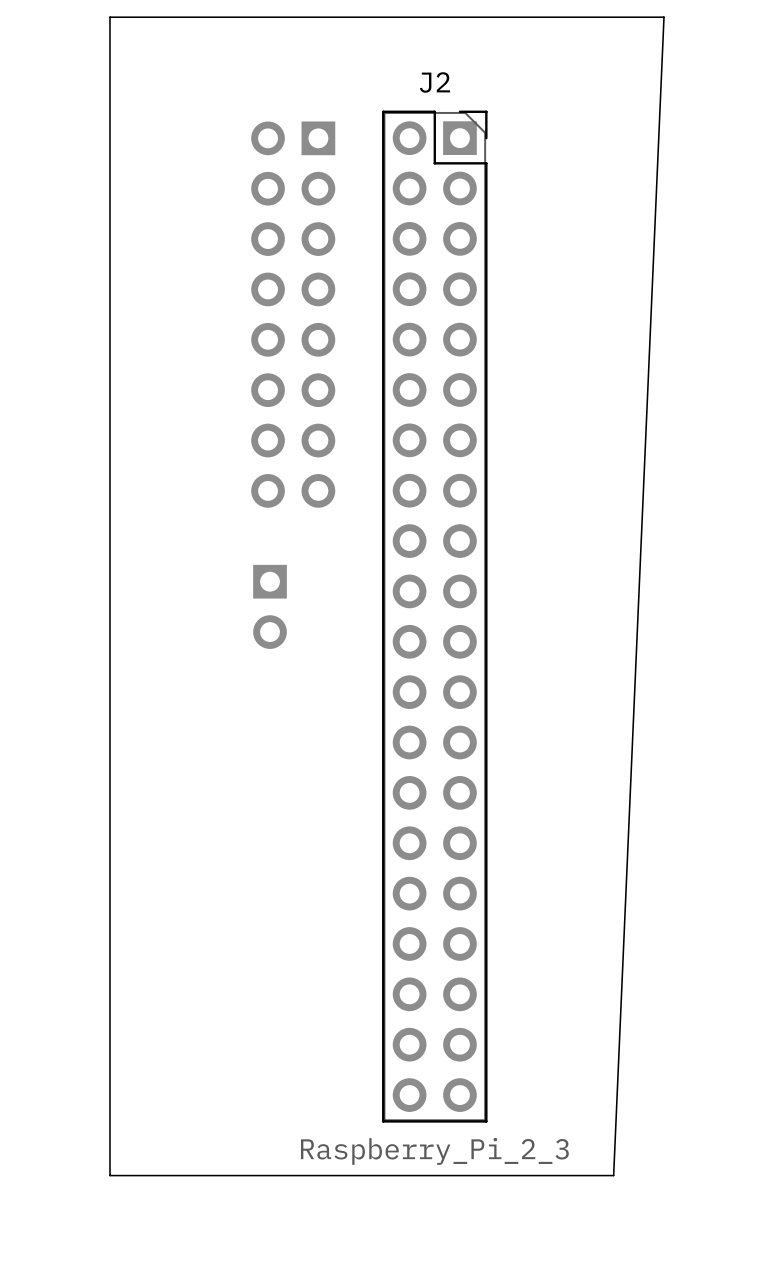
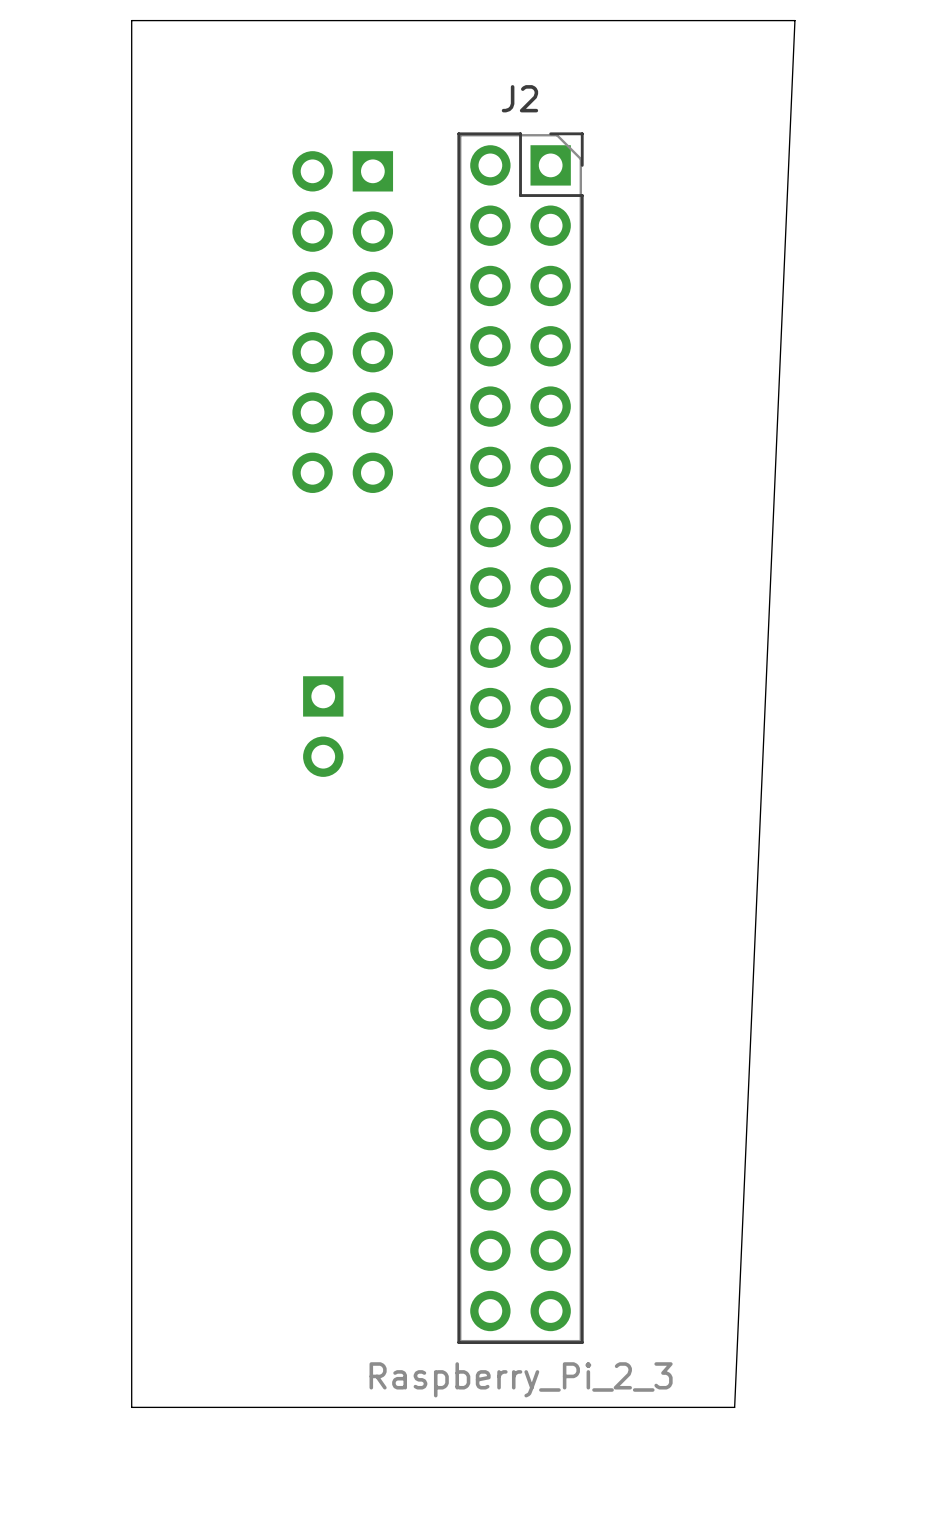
part: none -> (342, 322)
part: (293, 314) -> none

